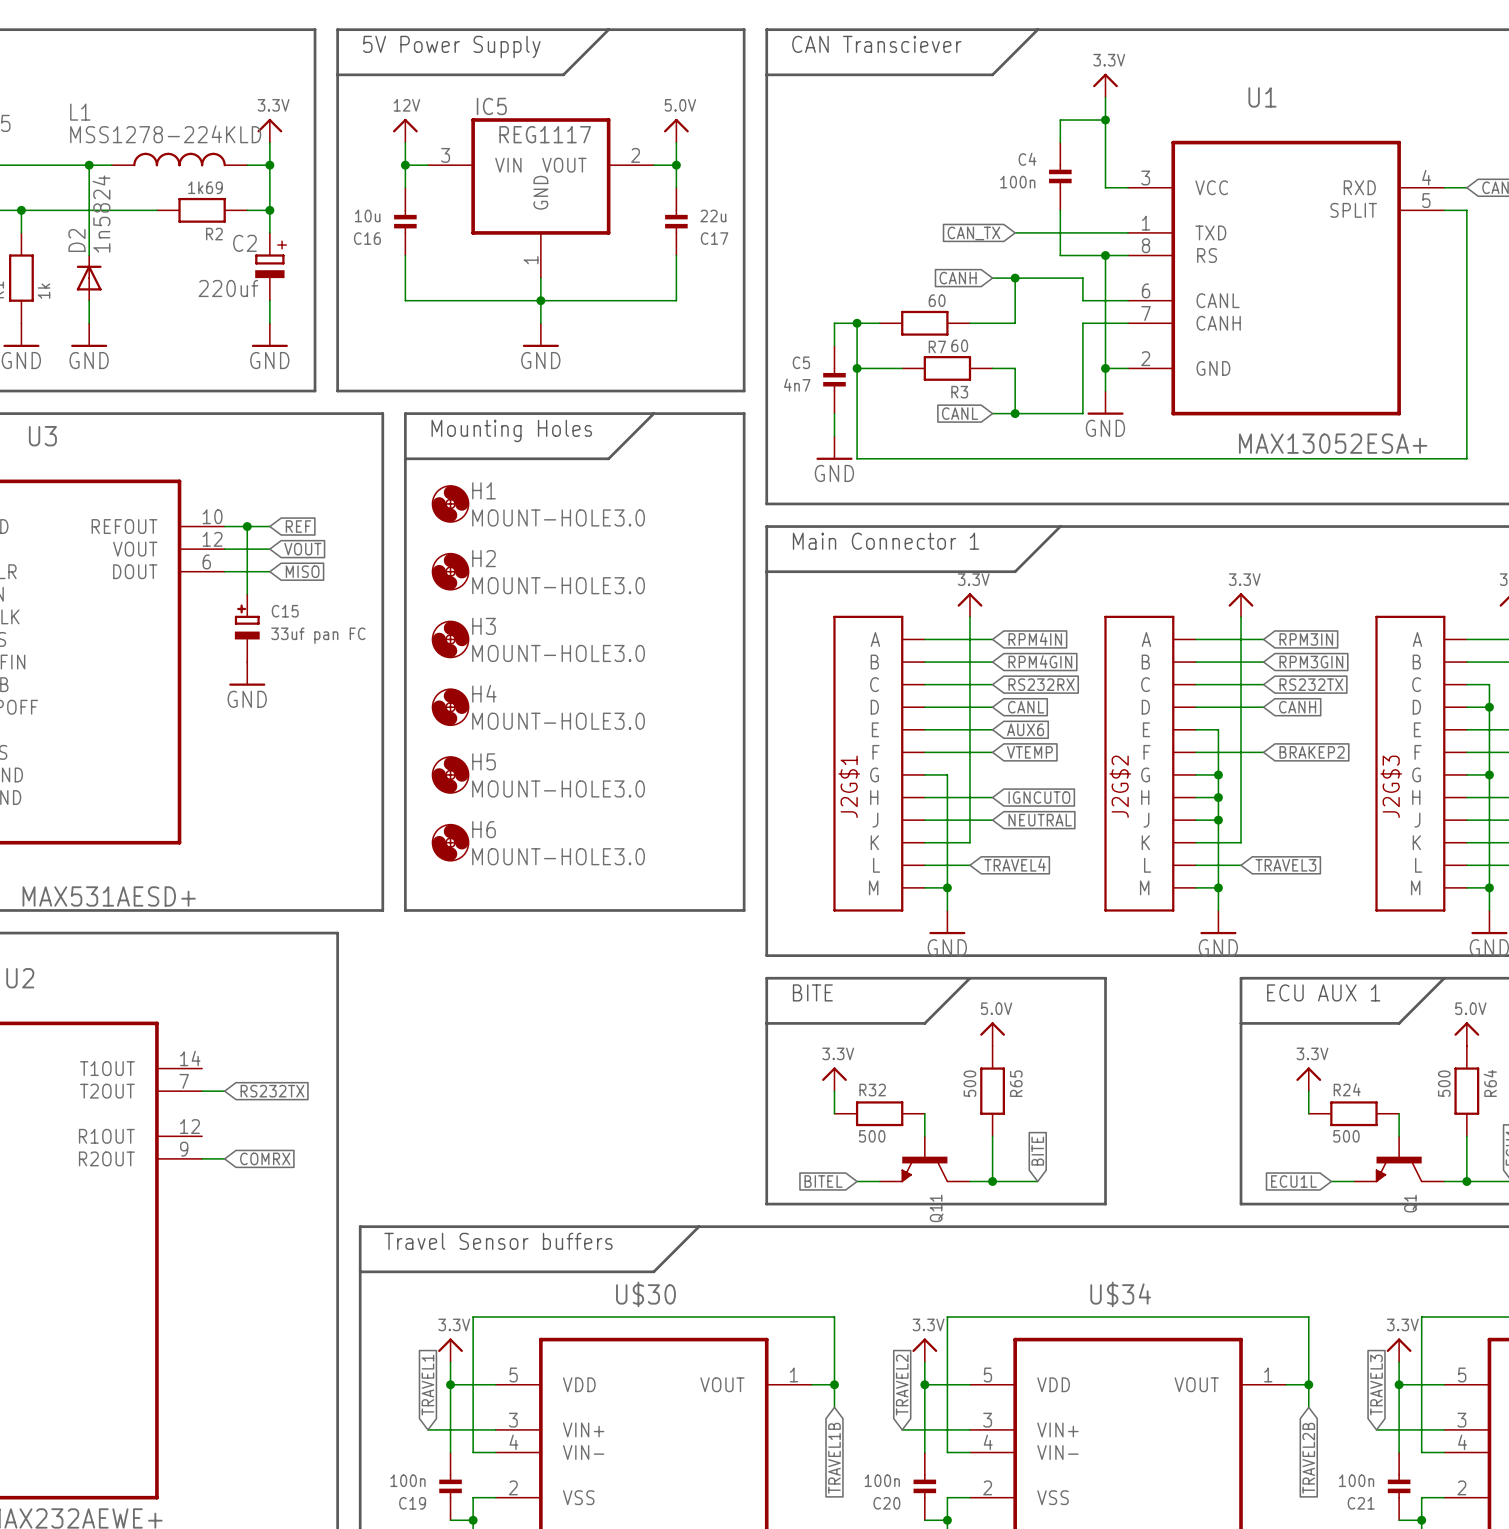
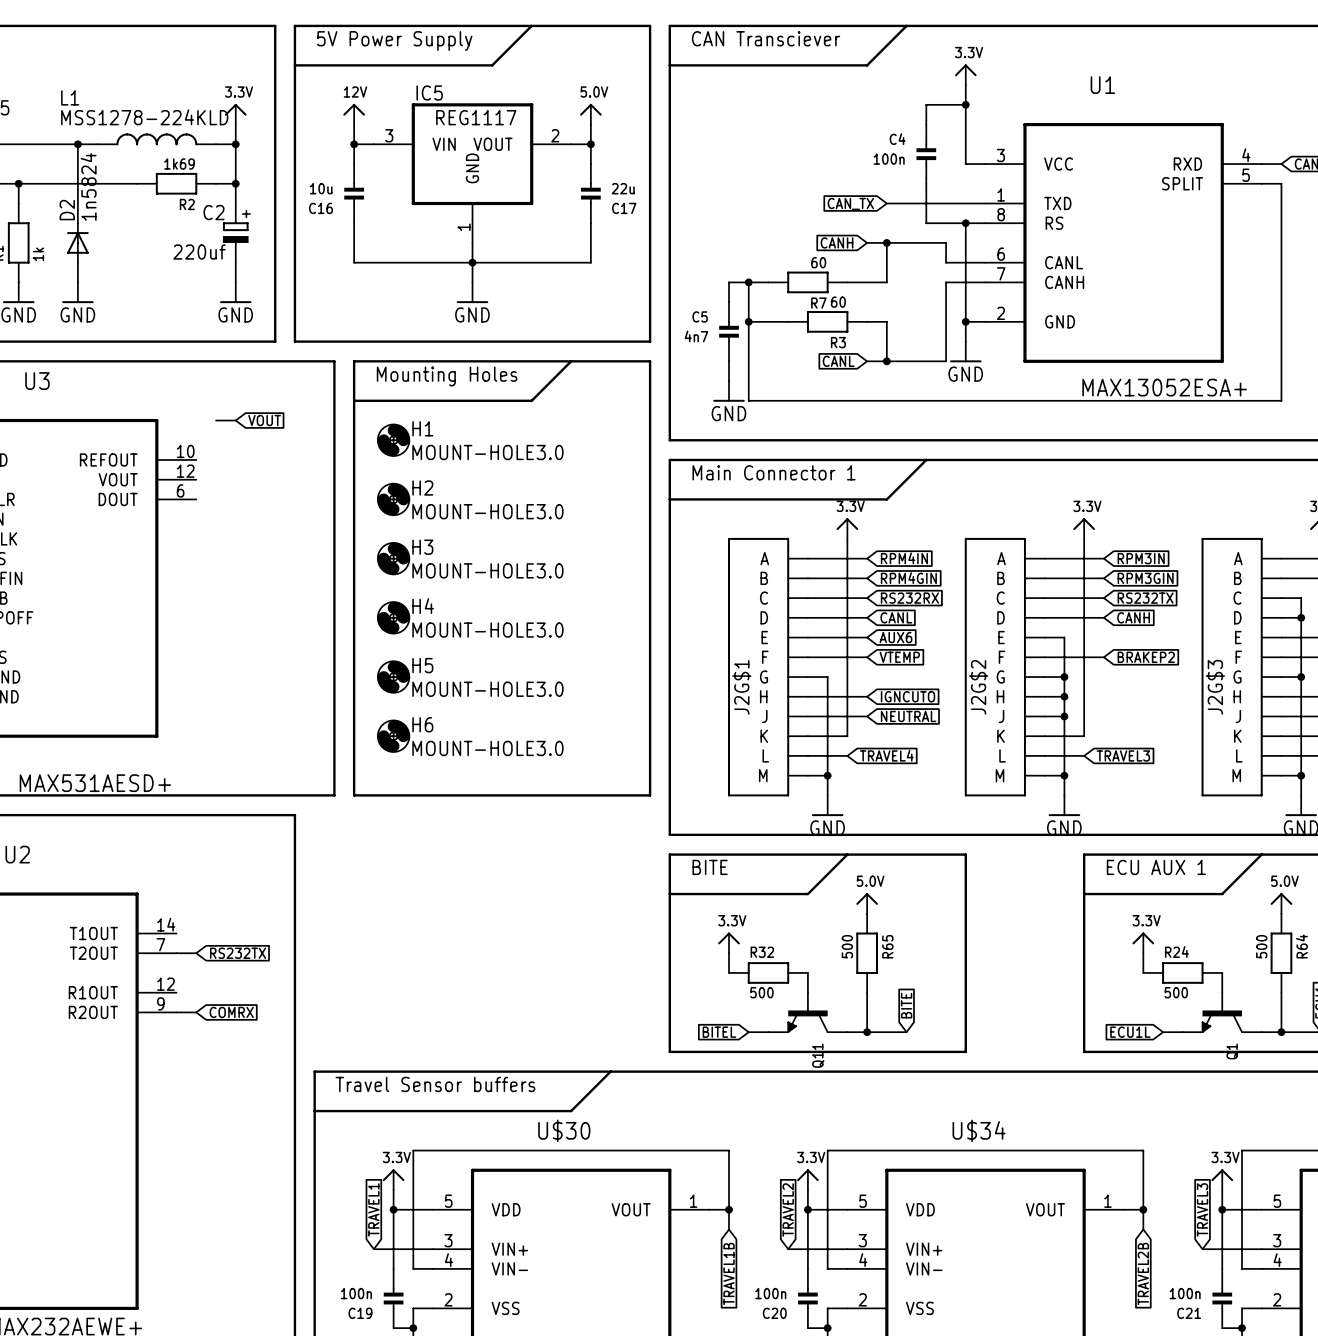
wire: none -> (216, 420) (235, 420)
wire: (224, 526) (269, 526) -> none
wire: (247, 526) (247, 594) -> none
junction: (247, 526) -> none
global label: REF (298, 526) -> none
wire: (224, 549) (269, 549) -> none
global label position: VOUT (302, 549) -> VOUT (264, 420)
wire: (224, 571) (269, 571) -> none
global label: MISO (302, 571) -> none
C15: 33uf pan FC (247, 628) -> none
power symbol: GND (247, 673) -> none

